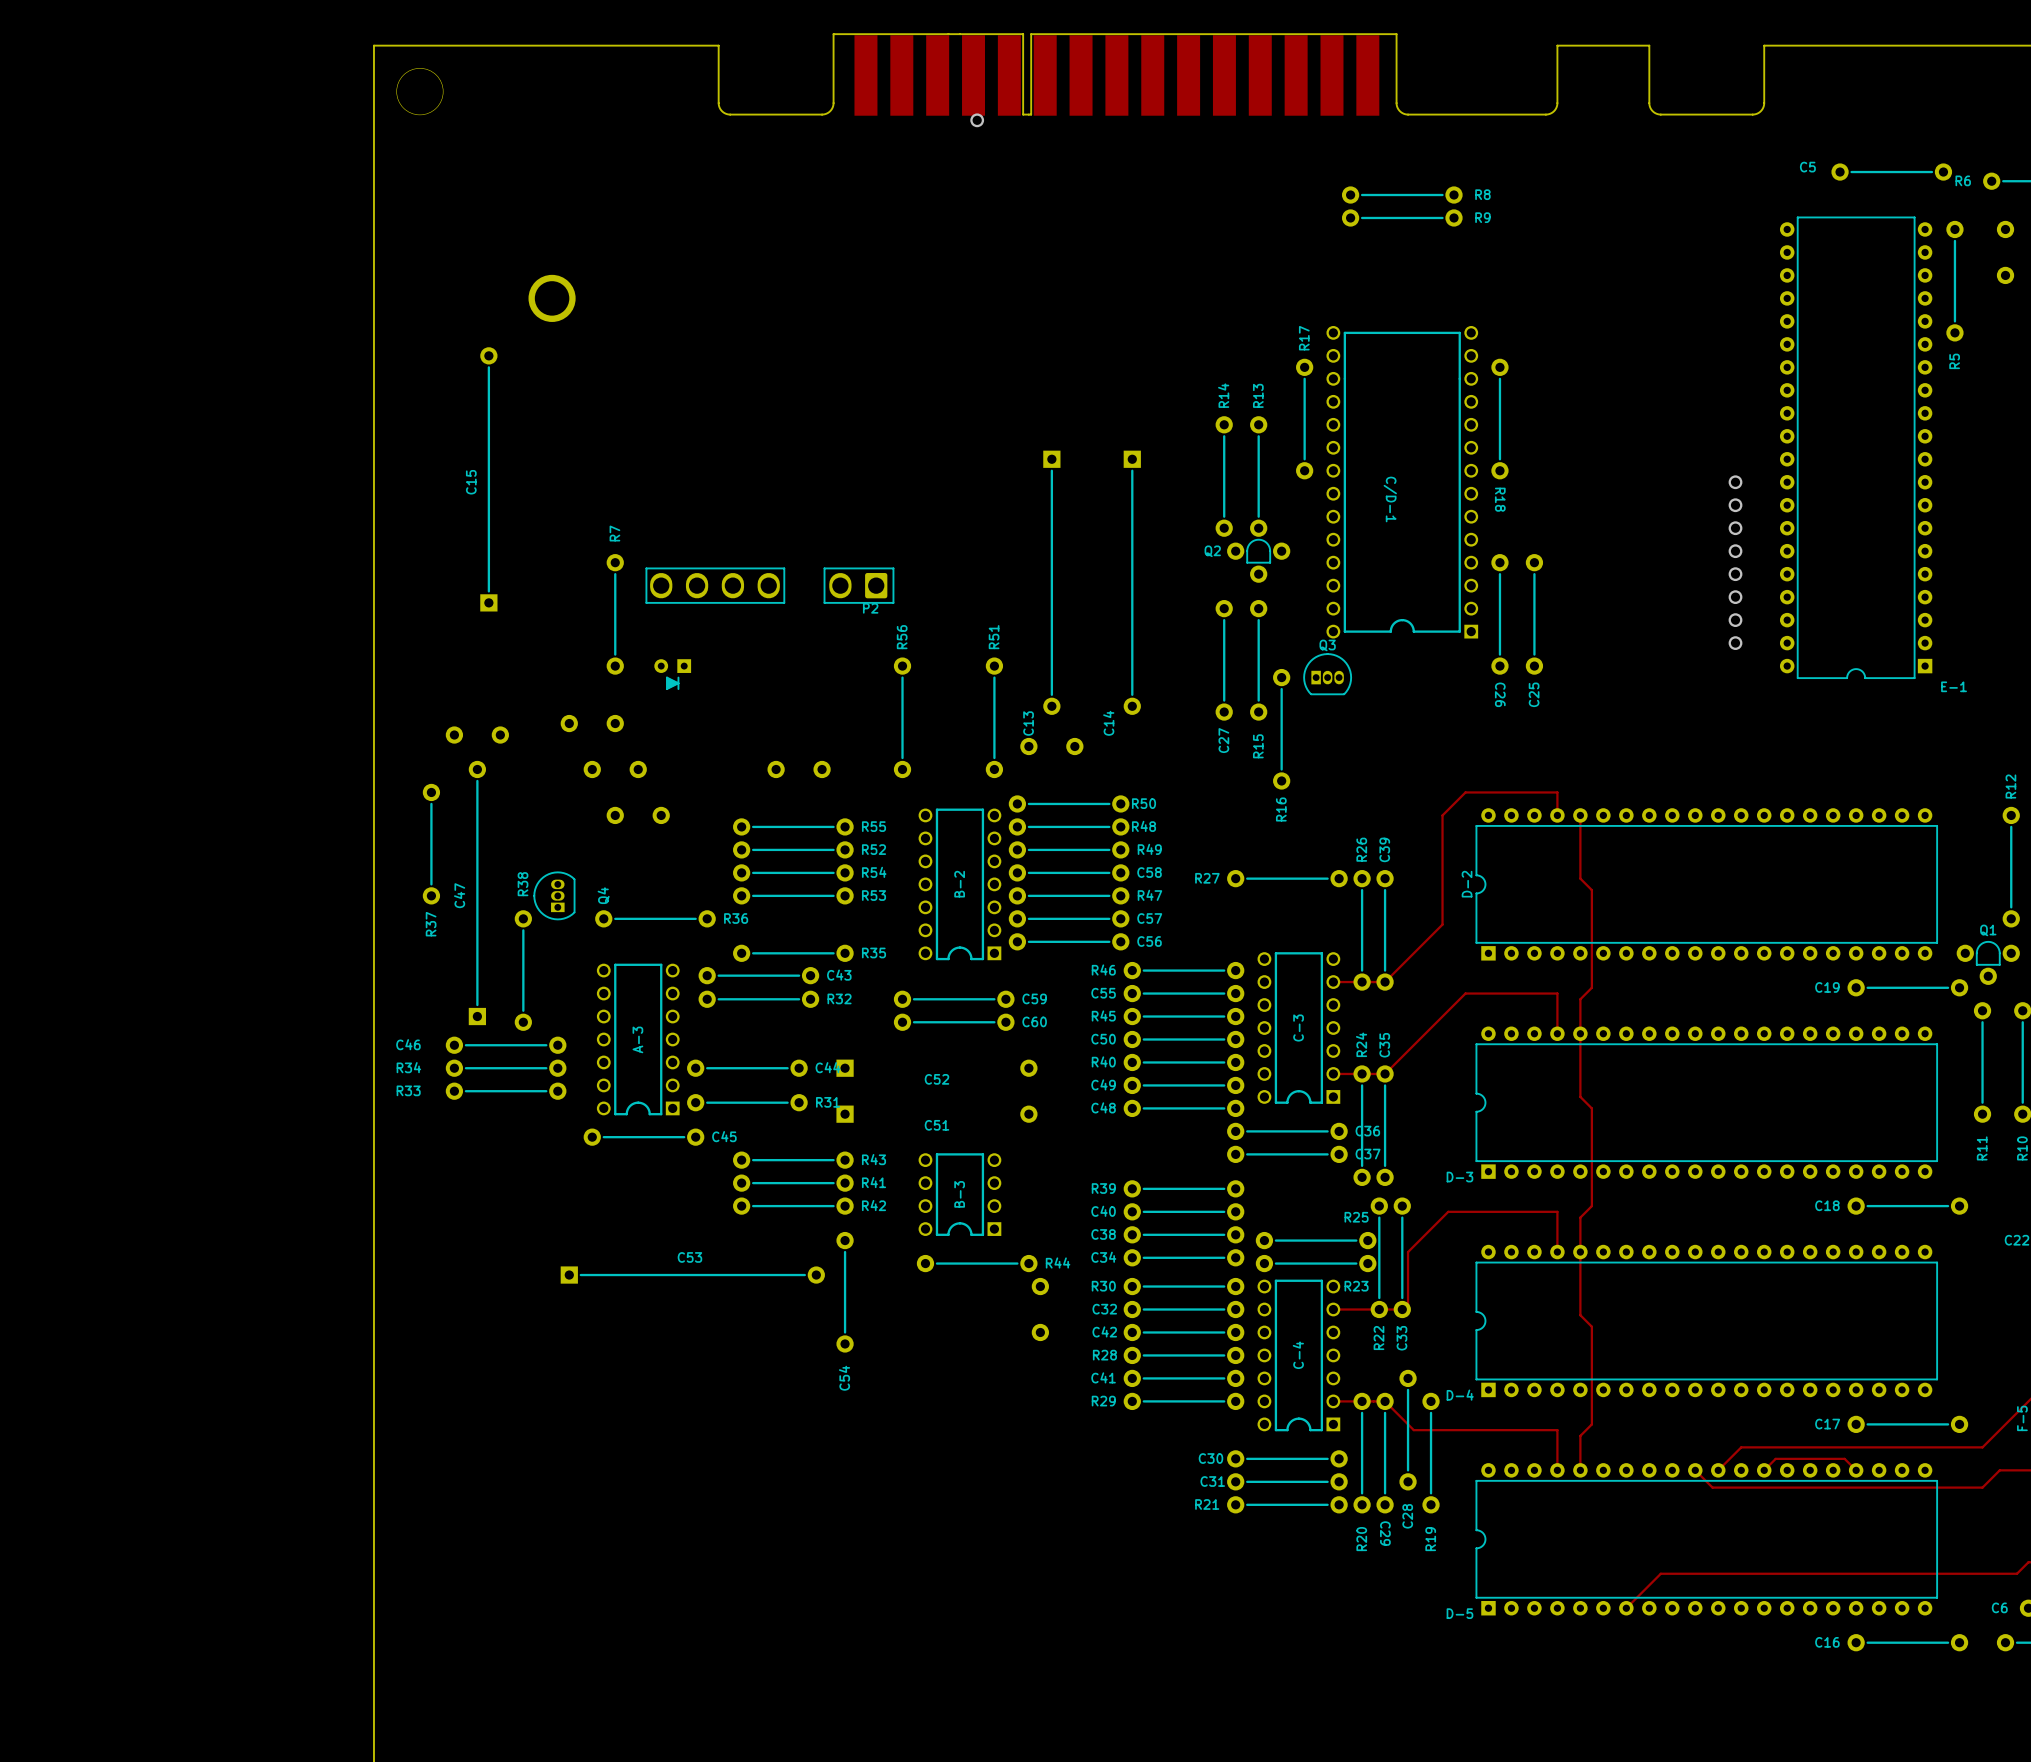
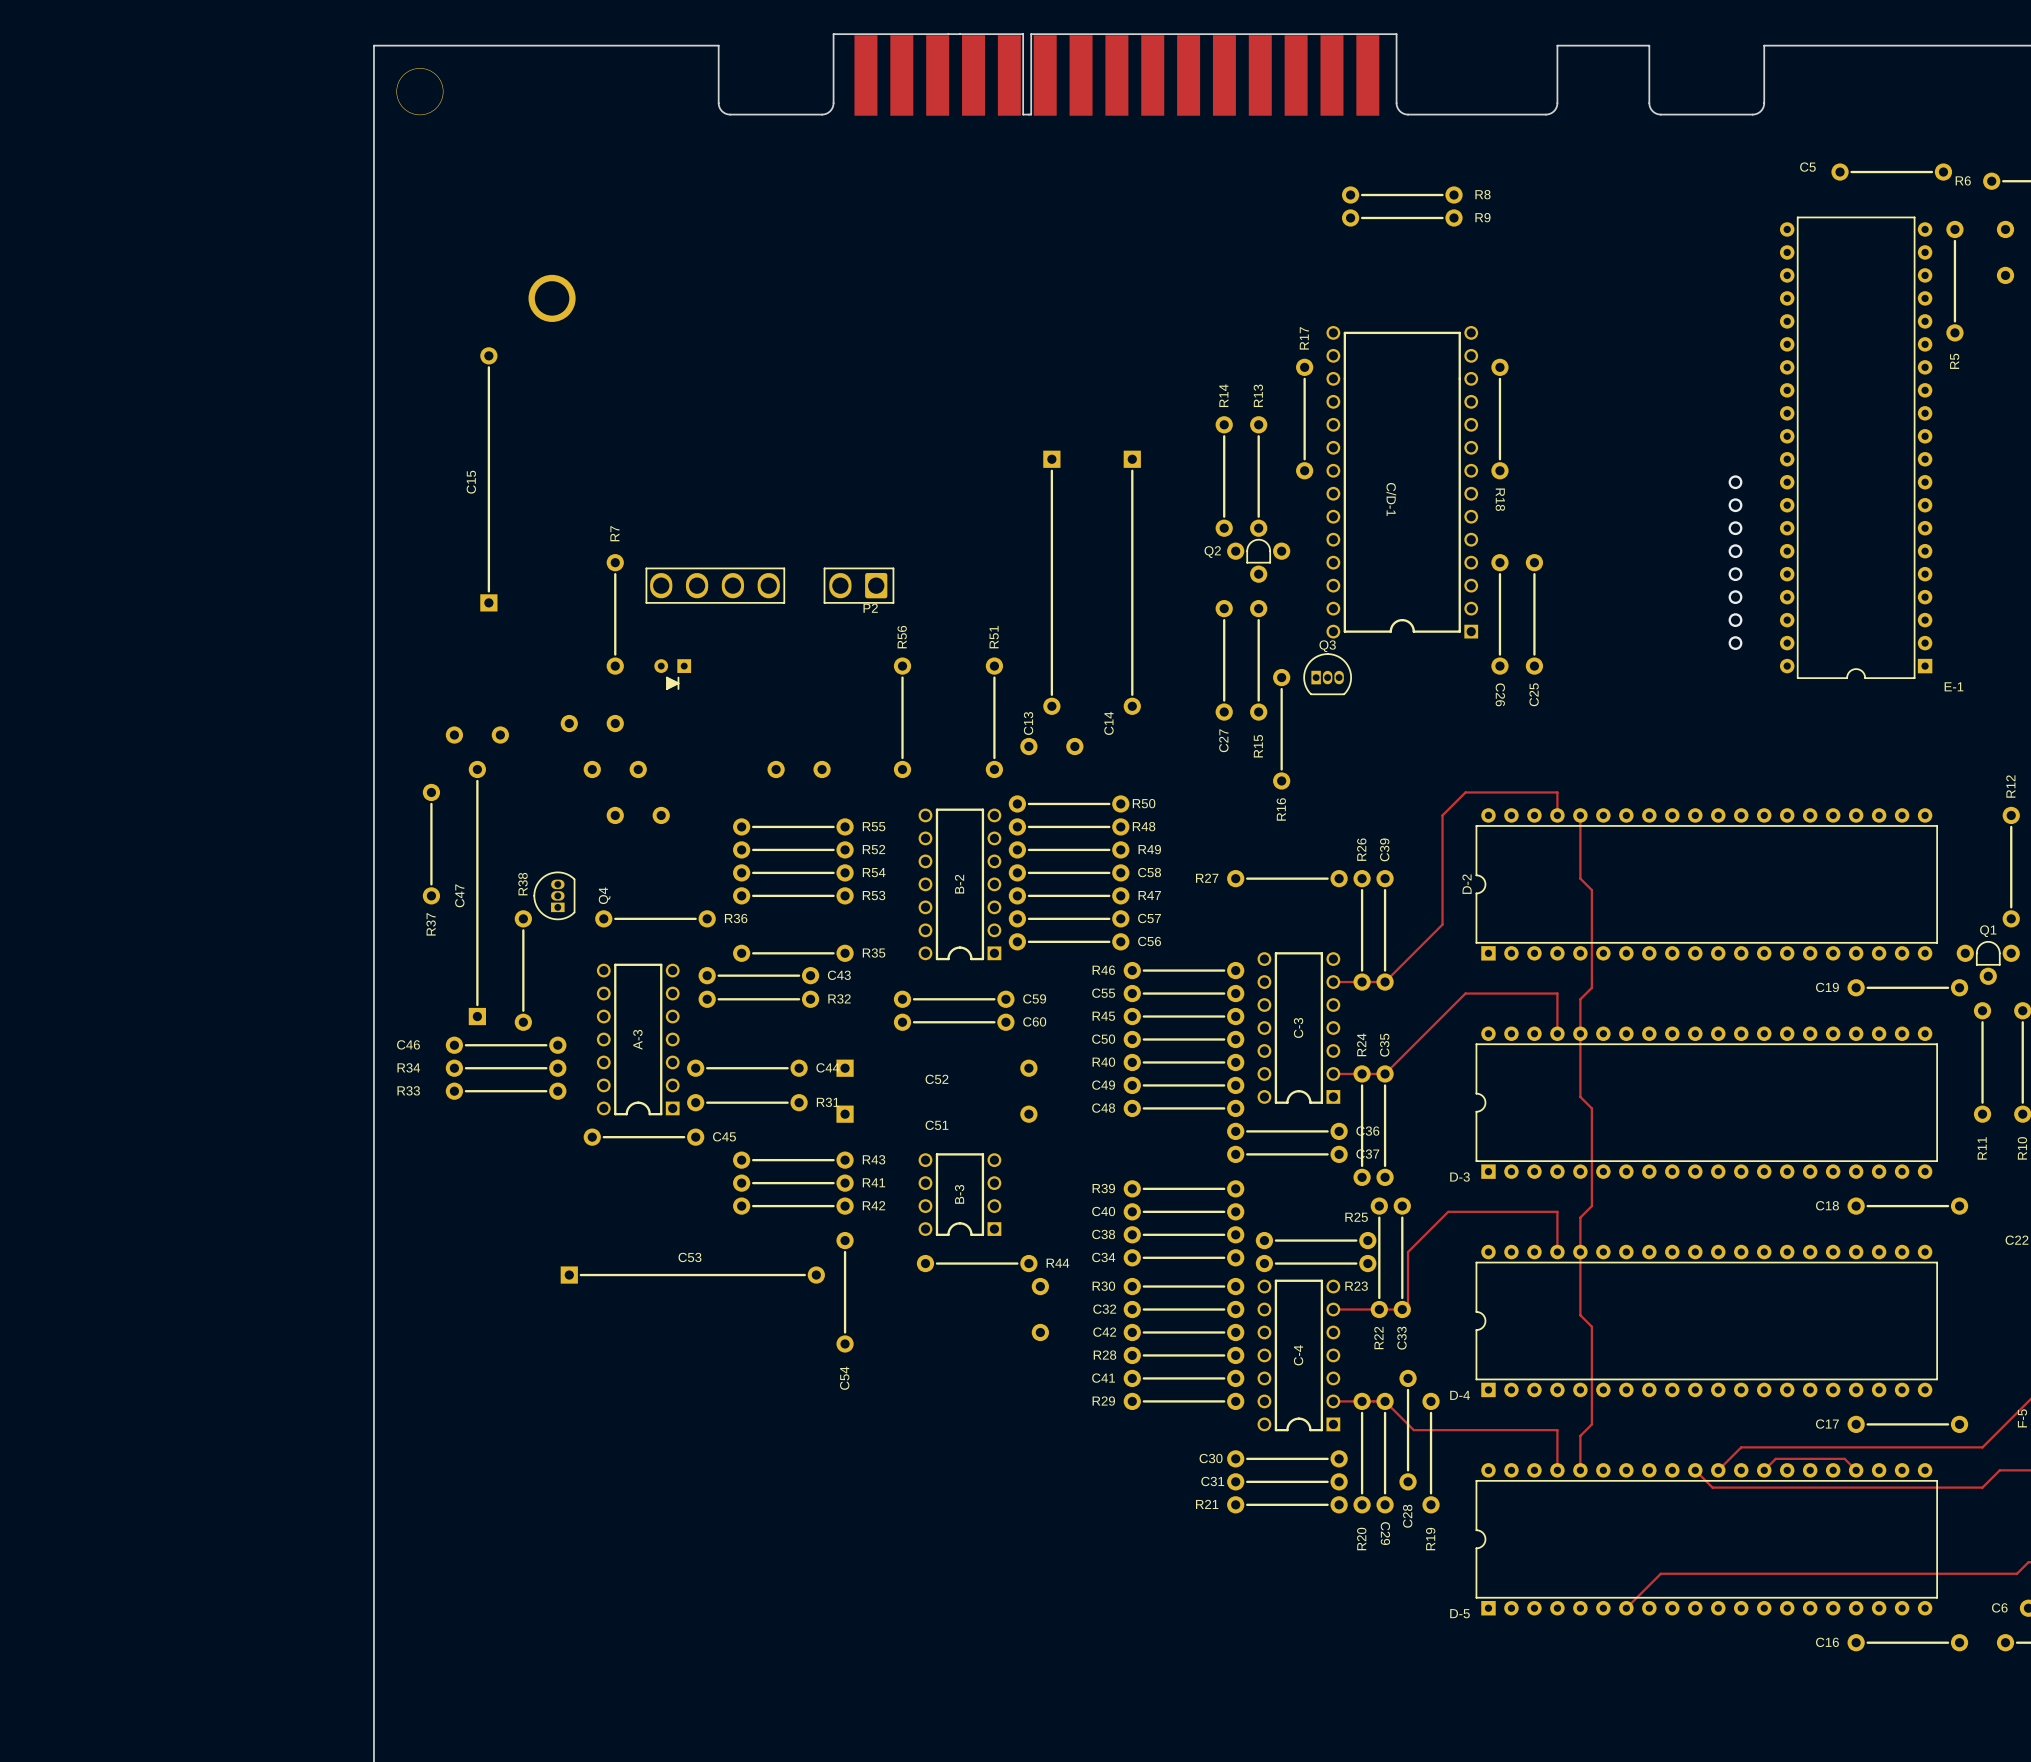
via: (977, 120) -> none

